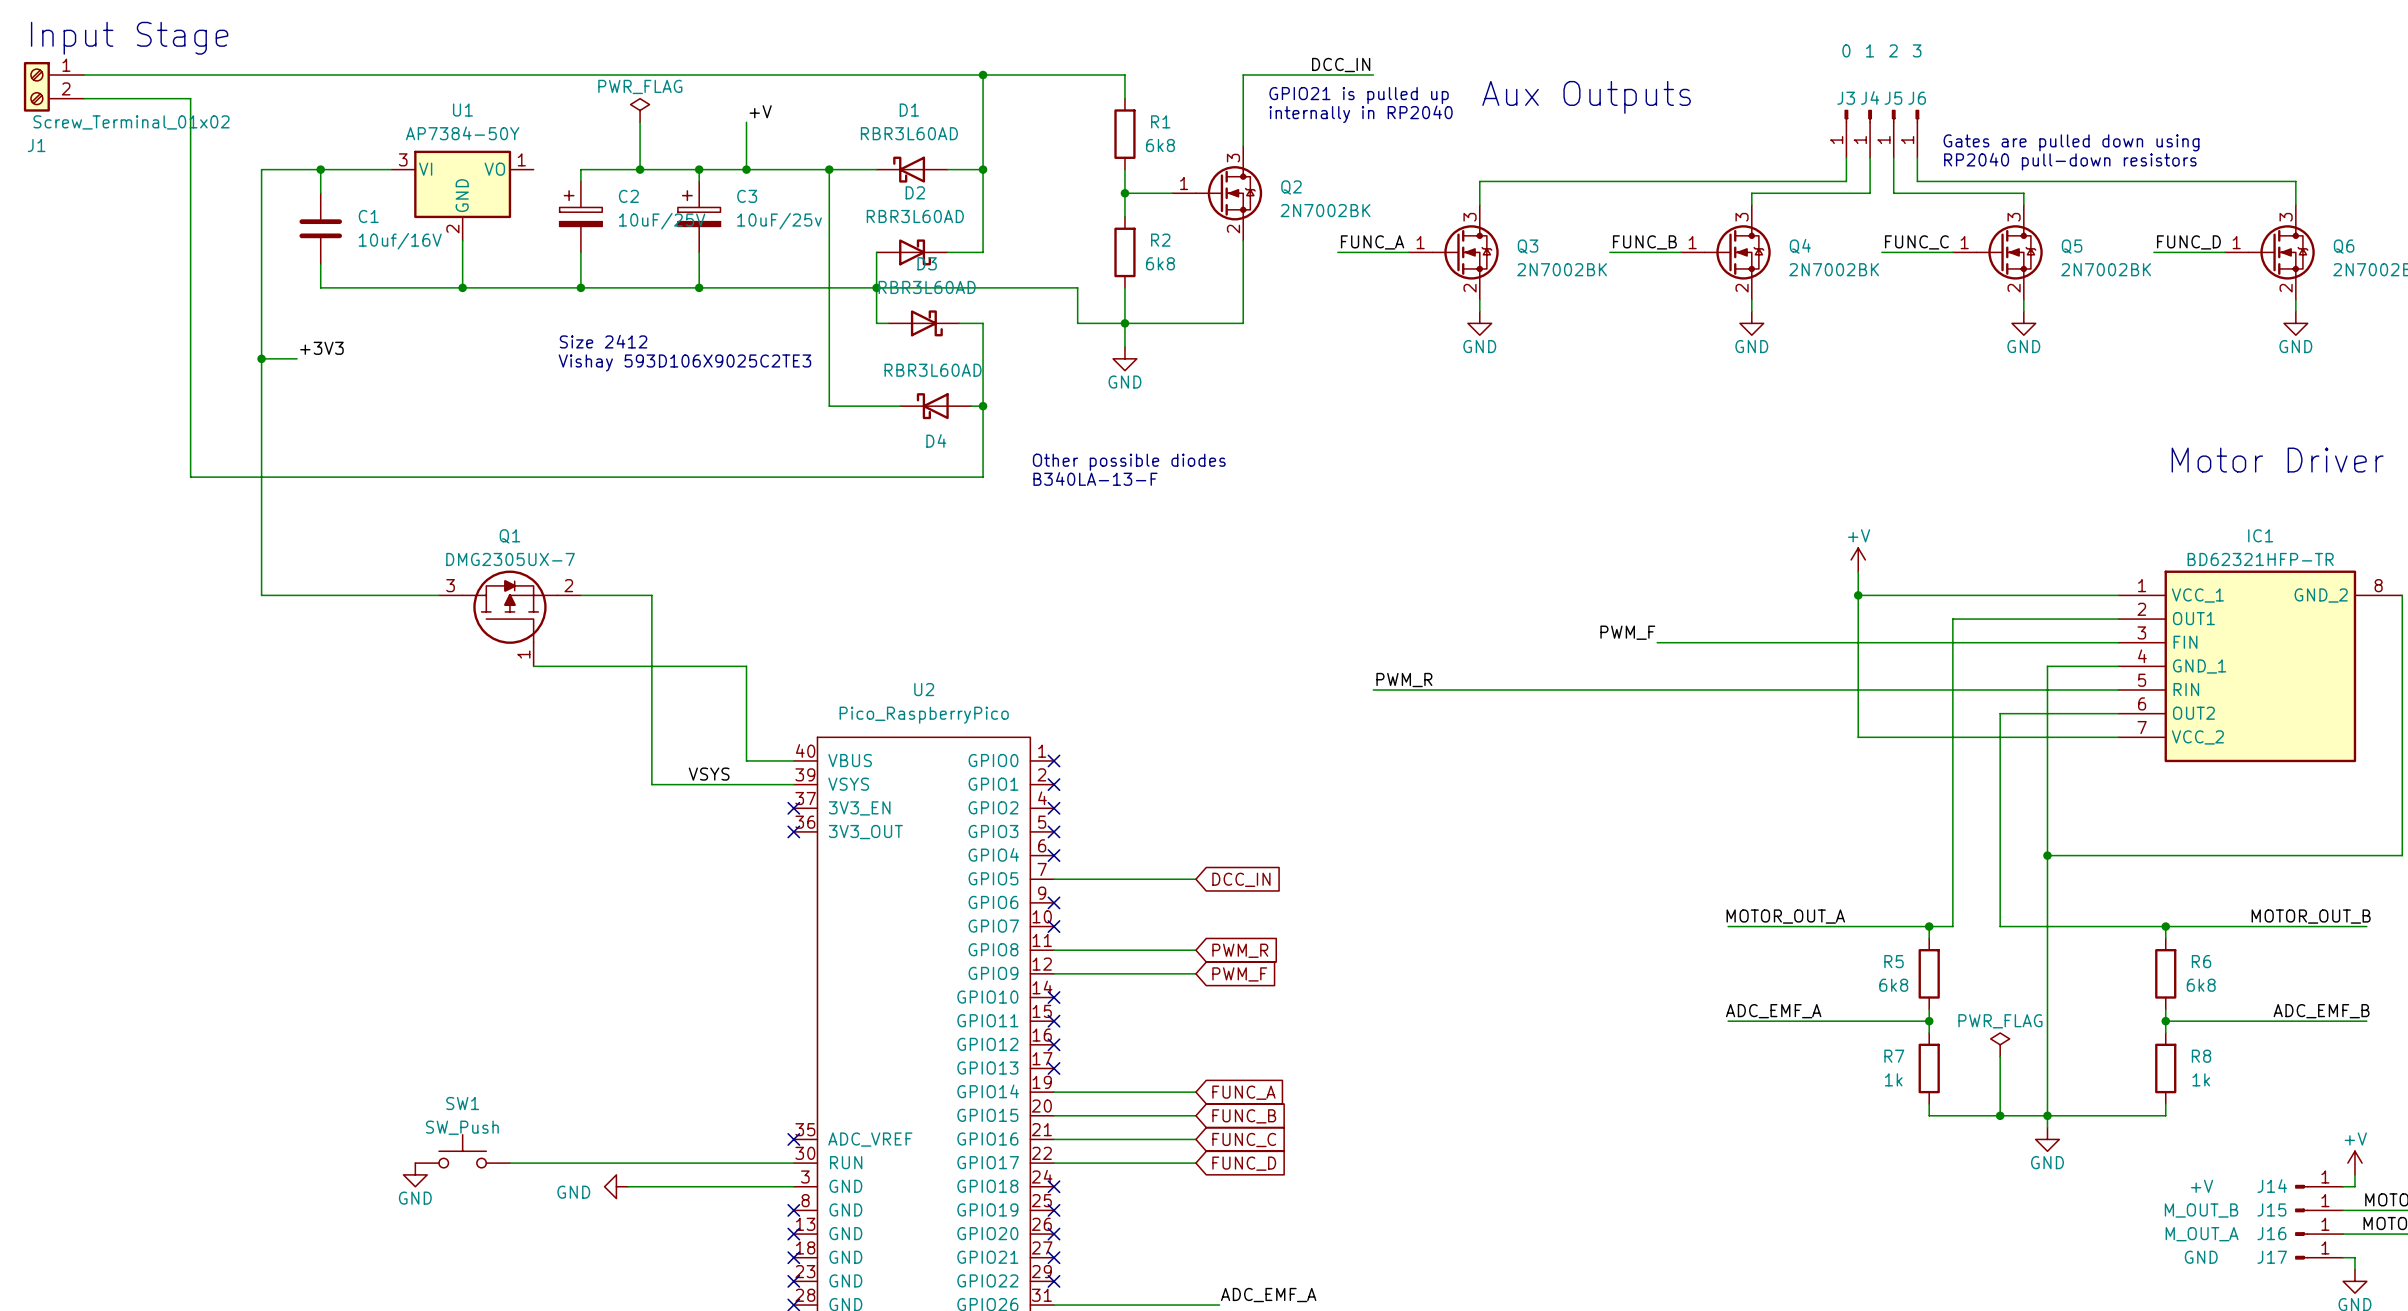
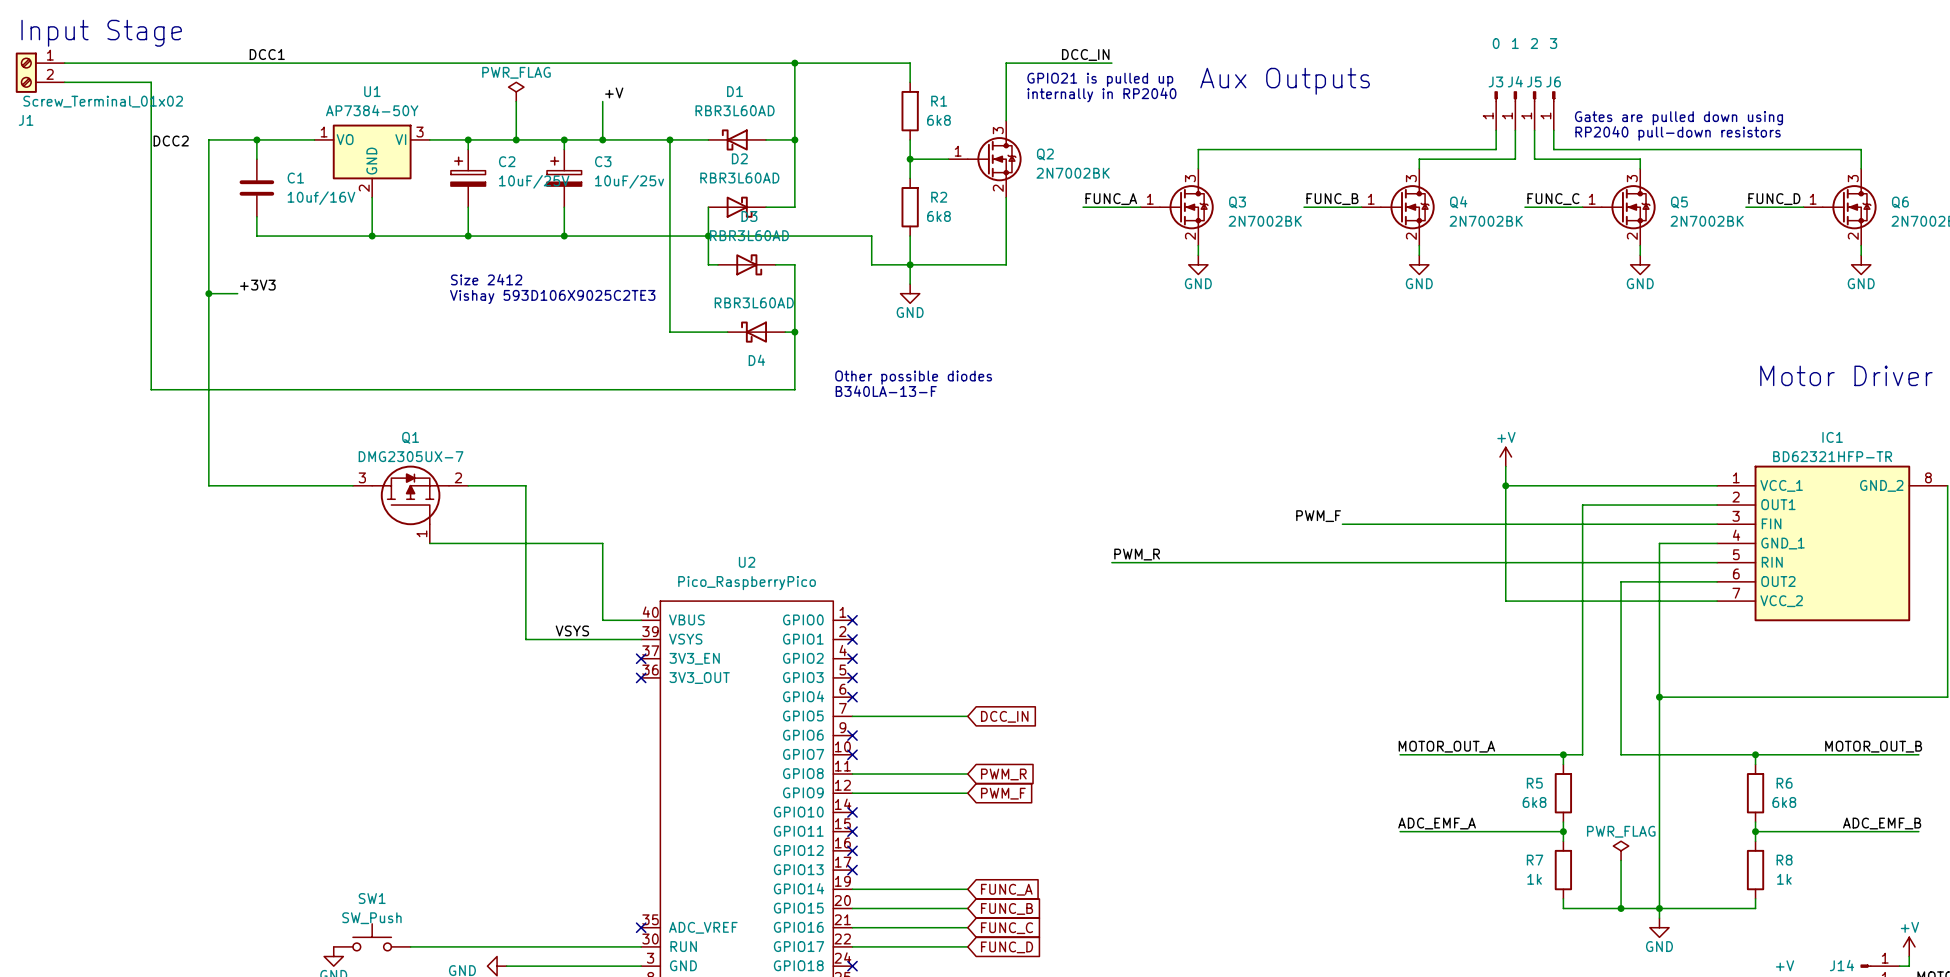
label: none -> DCC1 (267, 54)
wire: none -> (429, 139) (468, 139)
junction: none -> (468, 139)
label: none -> DCC2 (171, 140)
U1 flip: as is (462, 184) -> left-right (372, 151)

